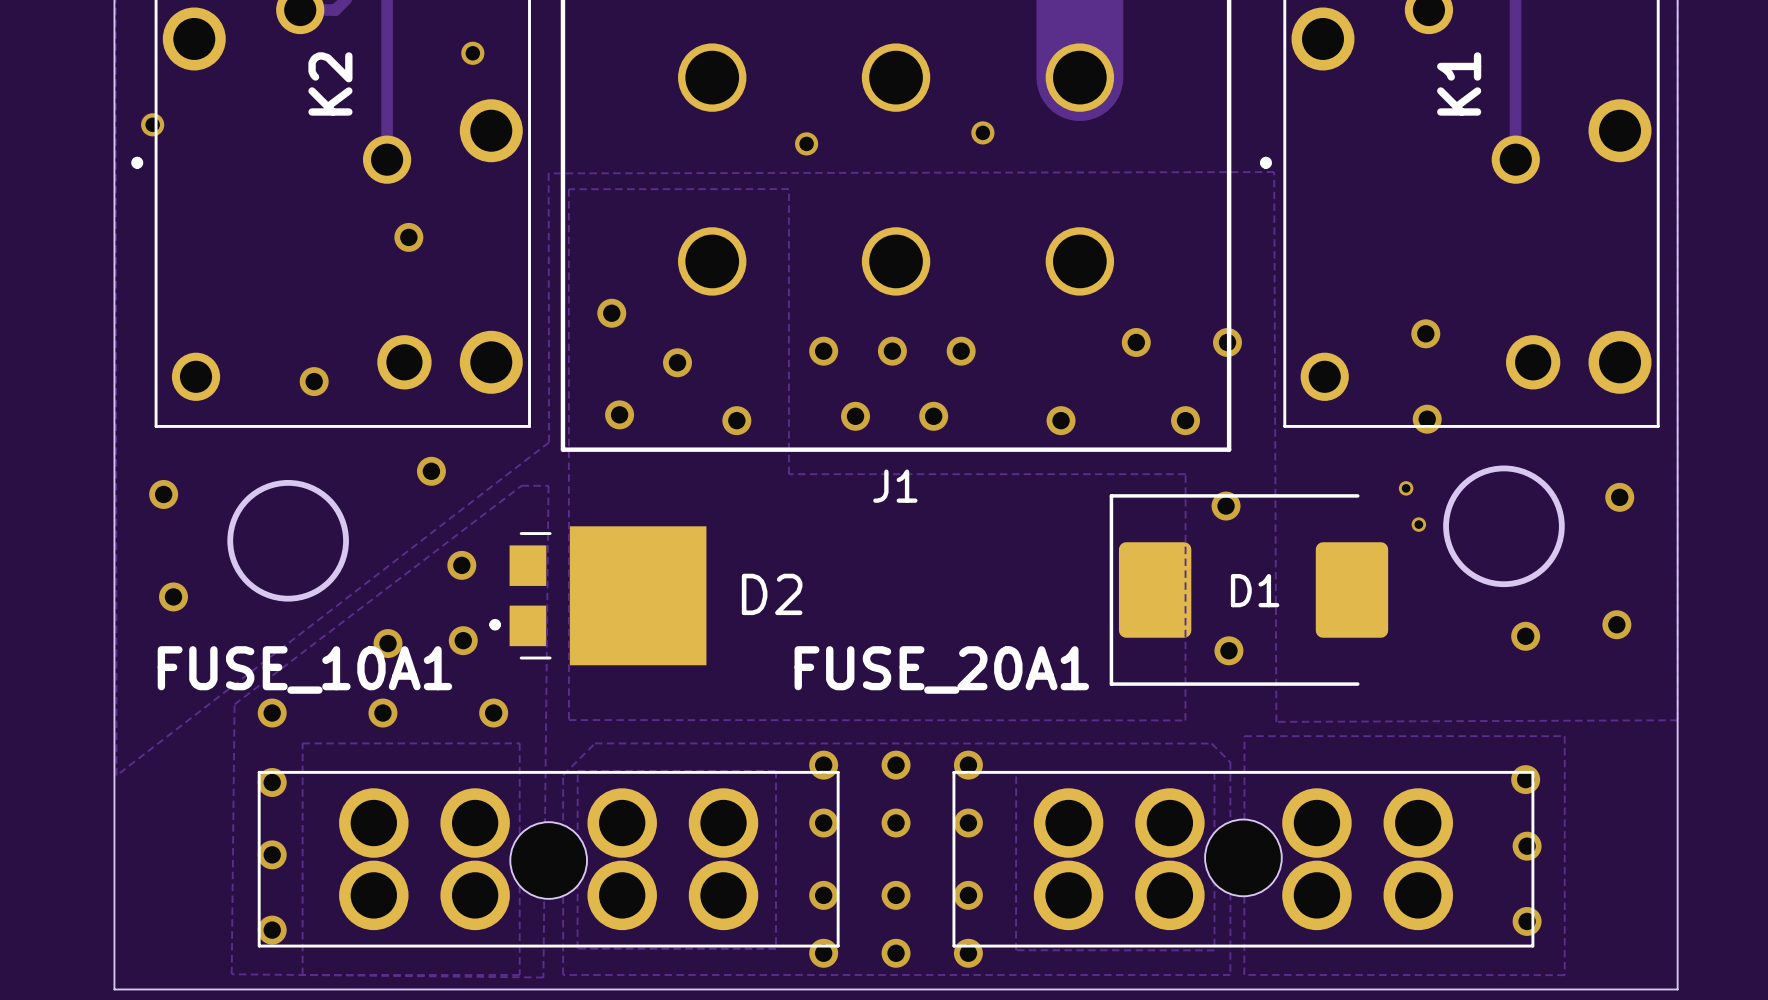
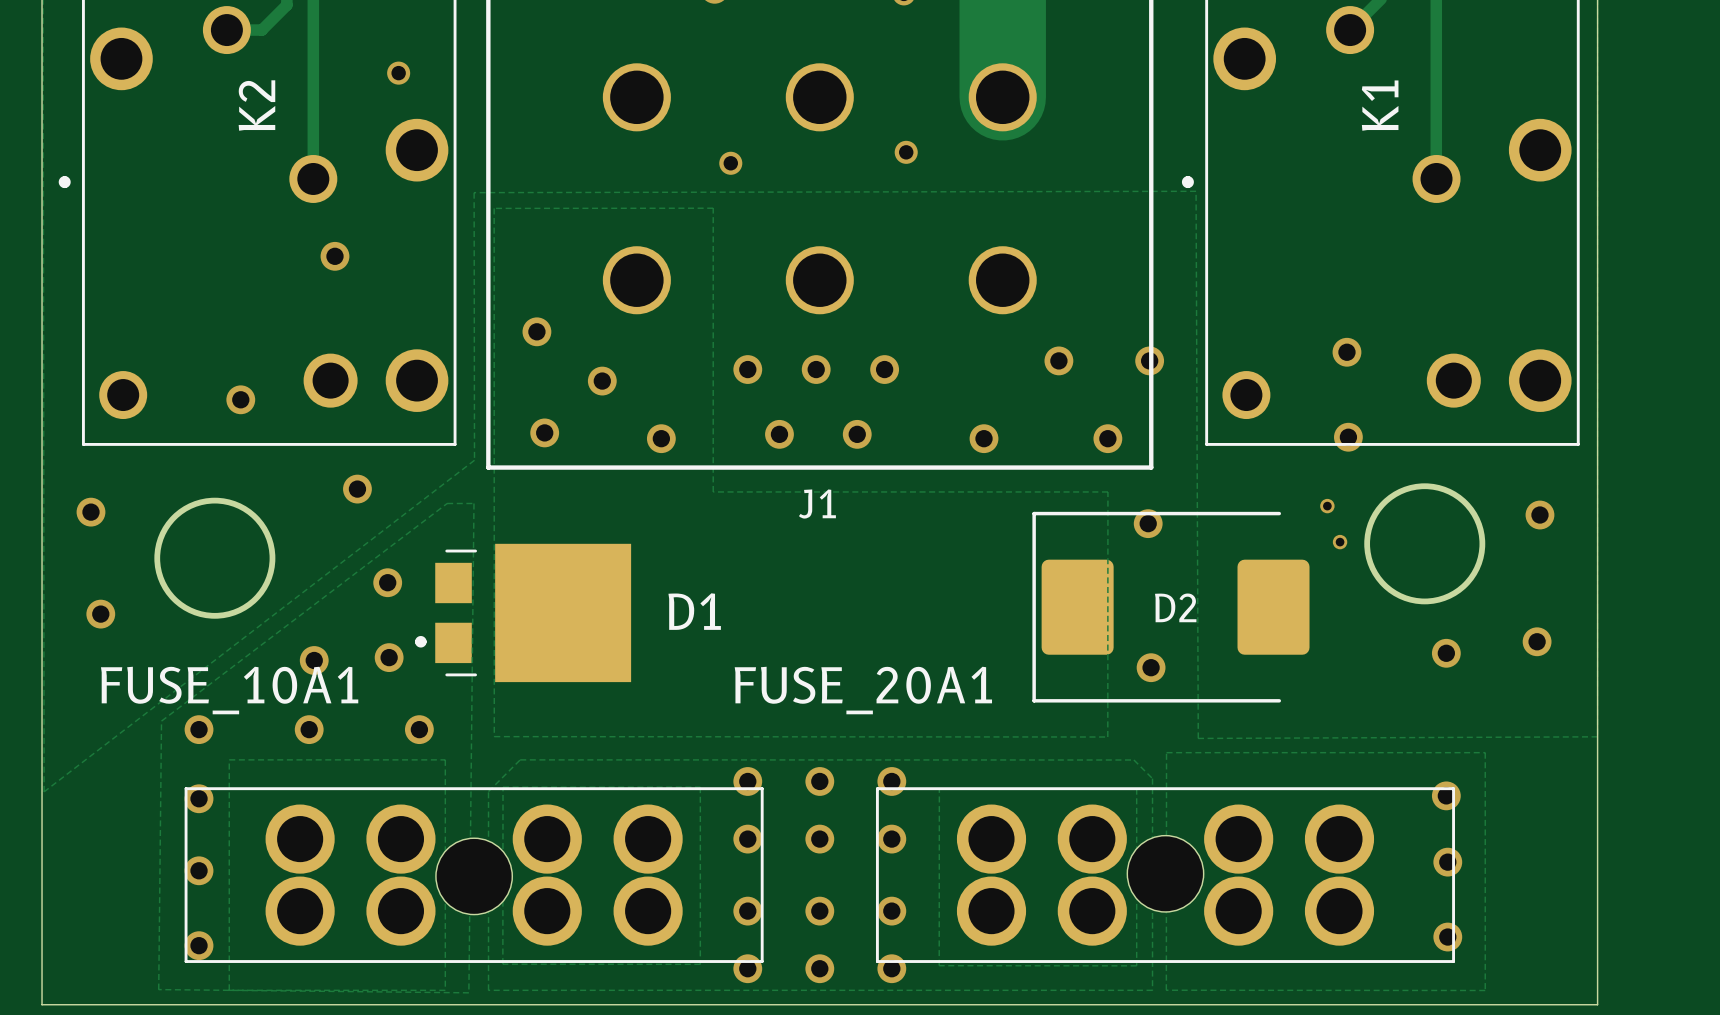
via: (152, 124) -> none
D1 name: D1 (1255, 590) -> D2 (1175, 607)
D2 name: D2 (772, 594) -> D1 (694, 611)

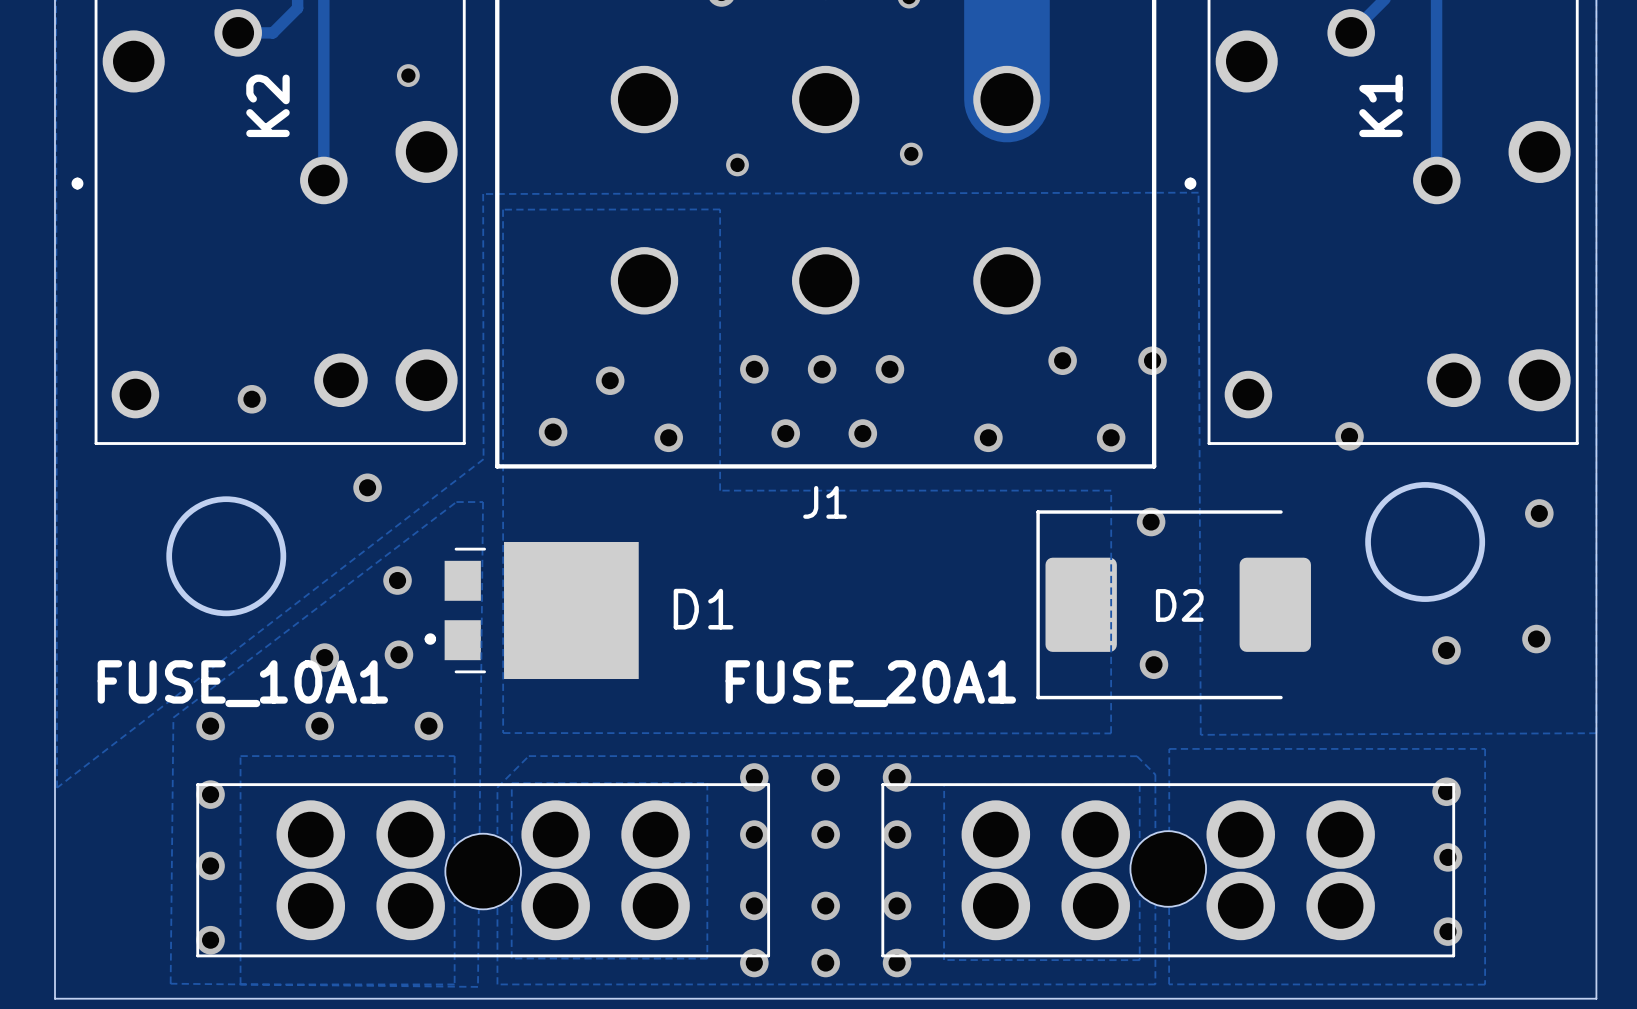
via: (334, 256) -> none
via: (536, 331) -> none
via: (1346, 352) -> none
via: (1327, 506) -> none
via: (90, 512) -> none
via: (1340, 542) -> none
via: (100, 614) -> none

